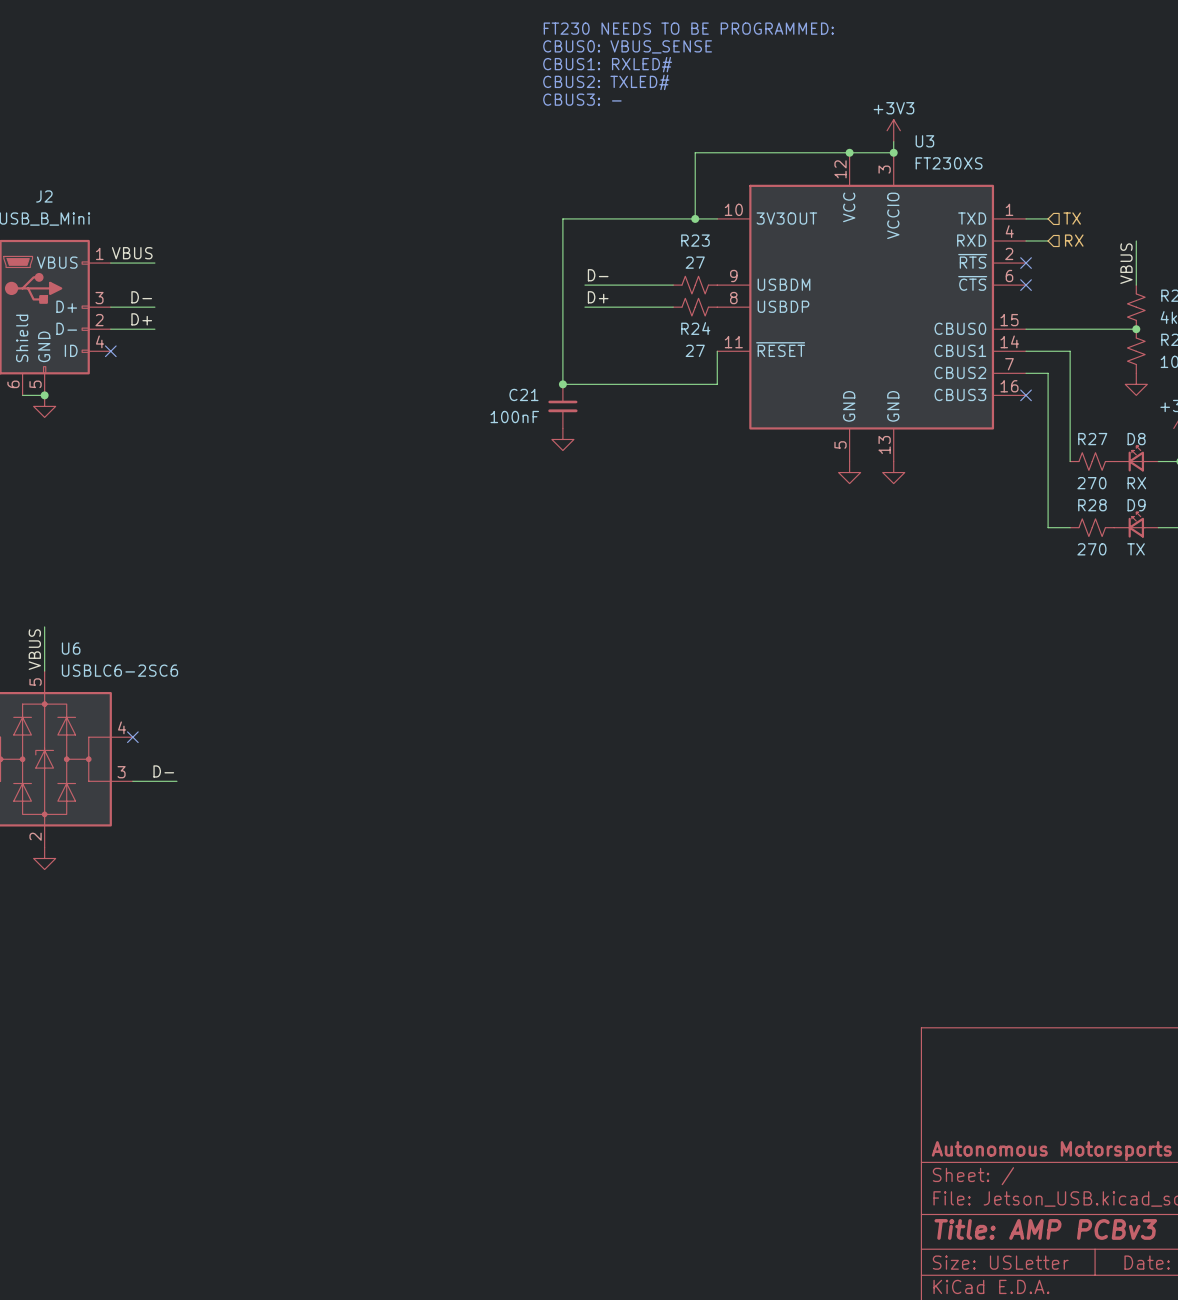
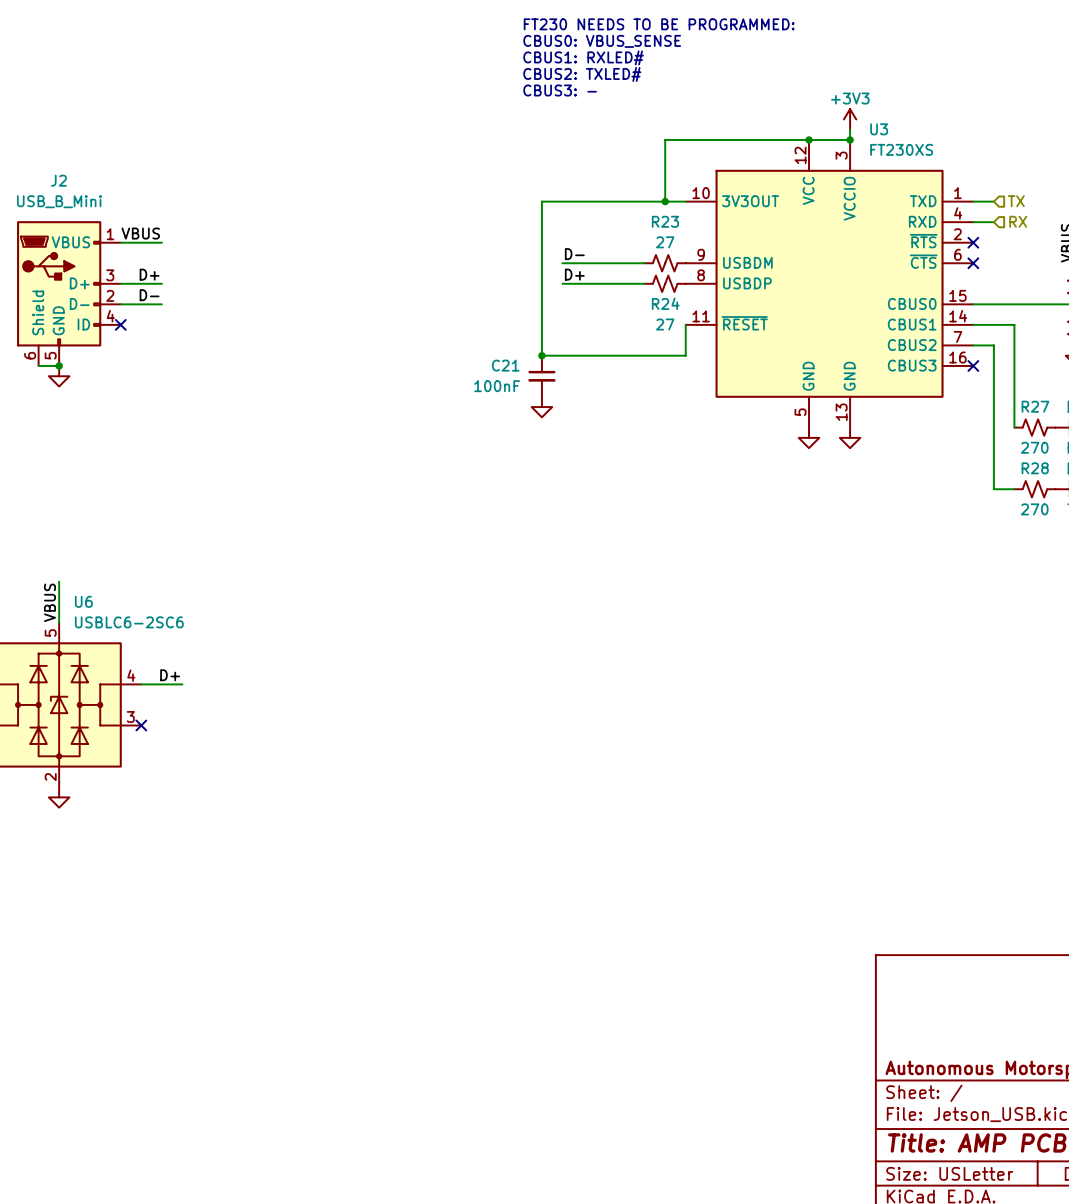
label: D- (141, 297) -> D+ (149, 274)
label: D+ (141, 319) -> D- (149, 295)
label: none -> D+ (170, 675)
no-connect mark position: (132, 737) -> (141, 725)
label: D- (163, 771) -> none
wire: (132, 781) (176, 781) -> (141, 684) (182, 684)

